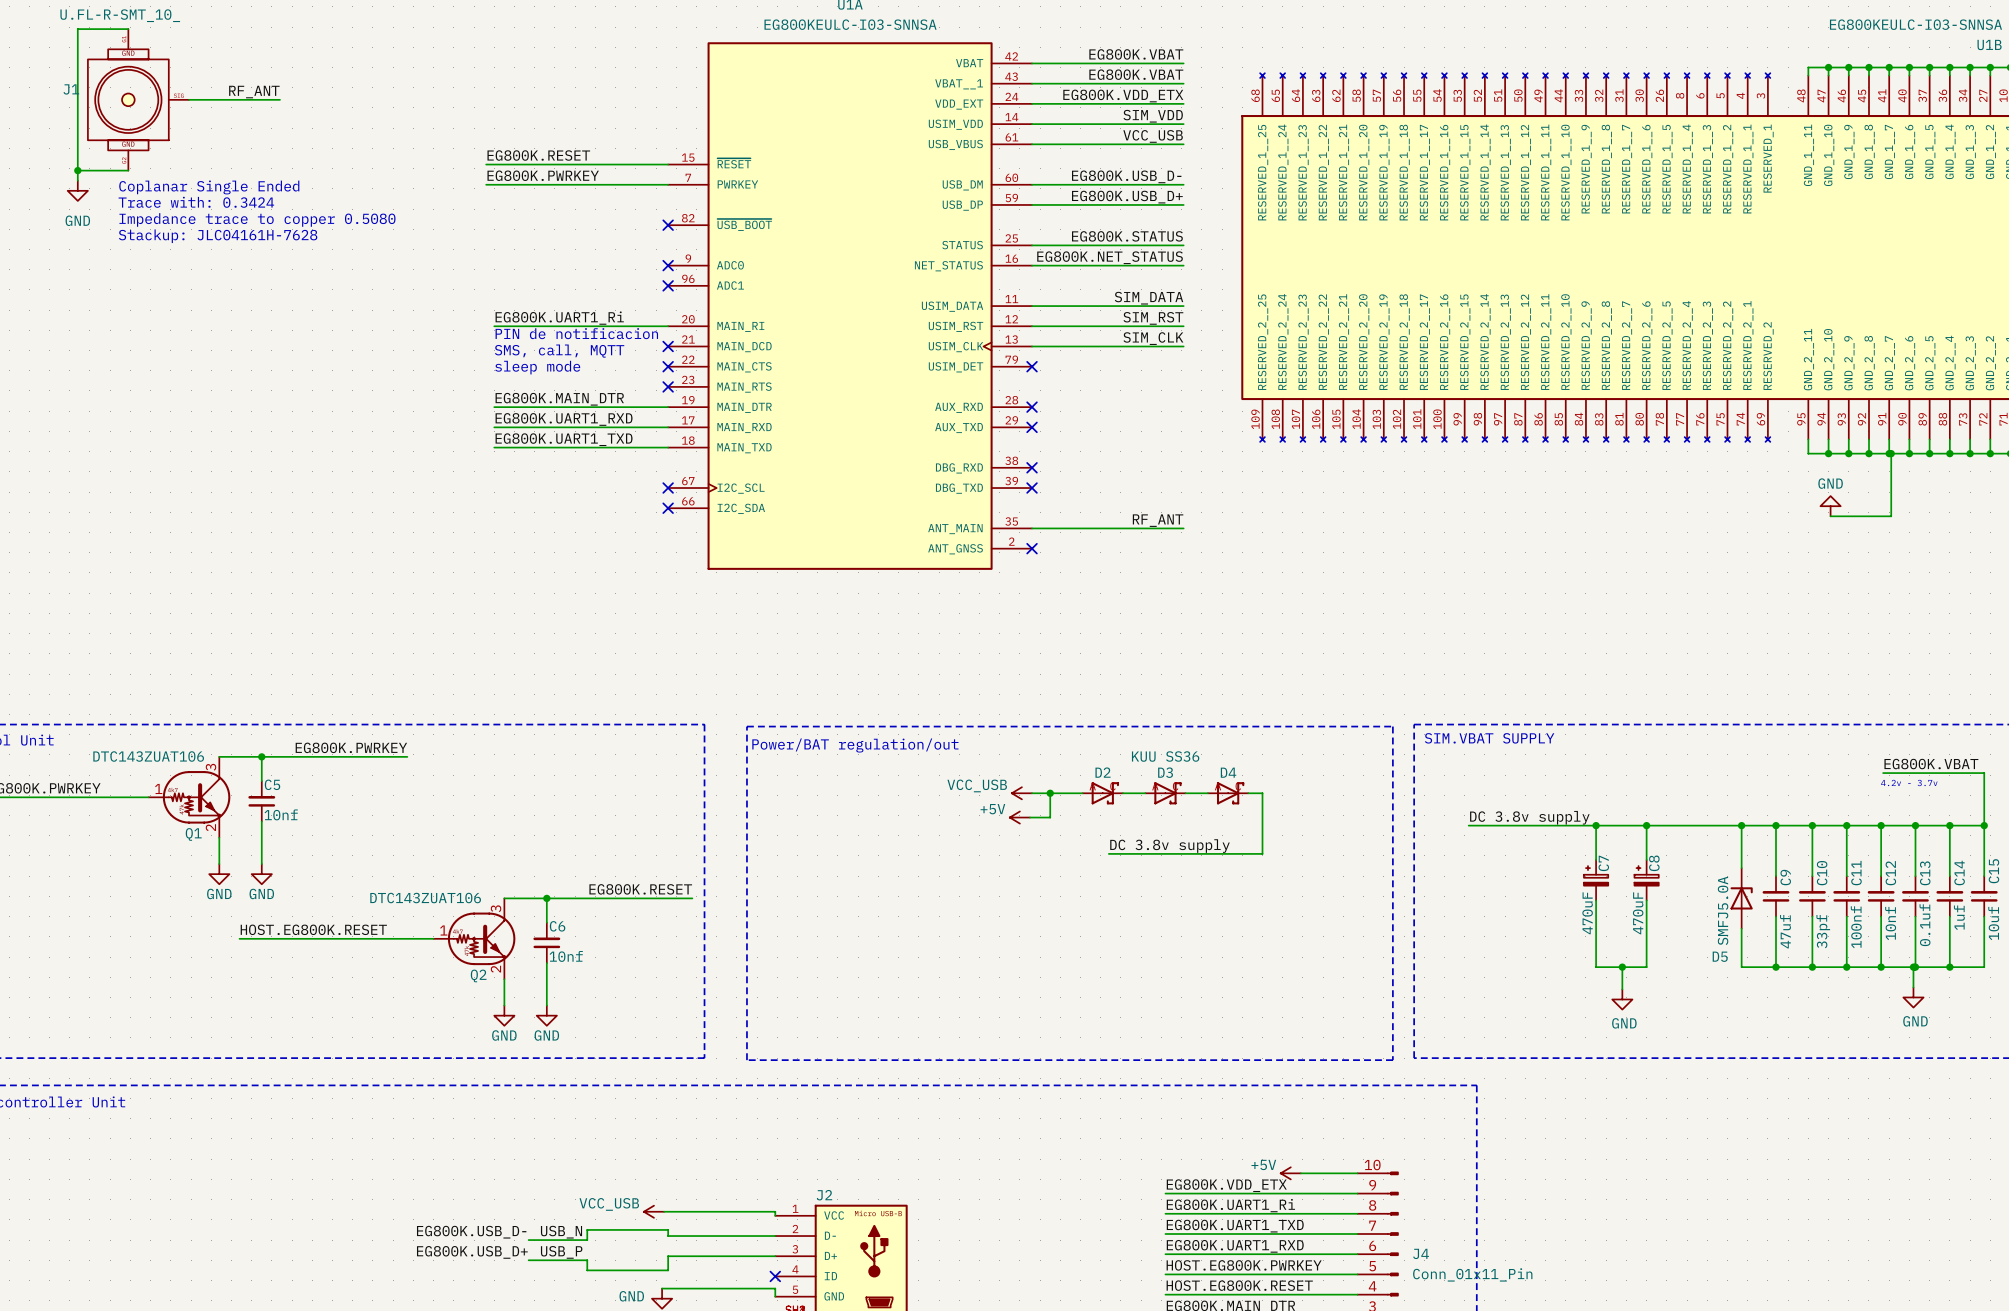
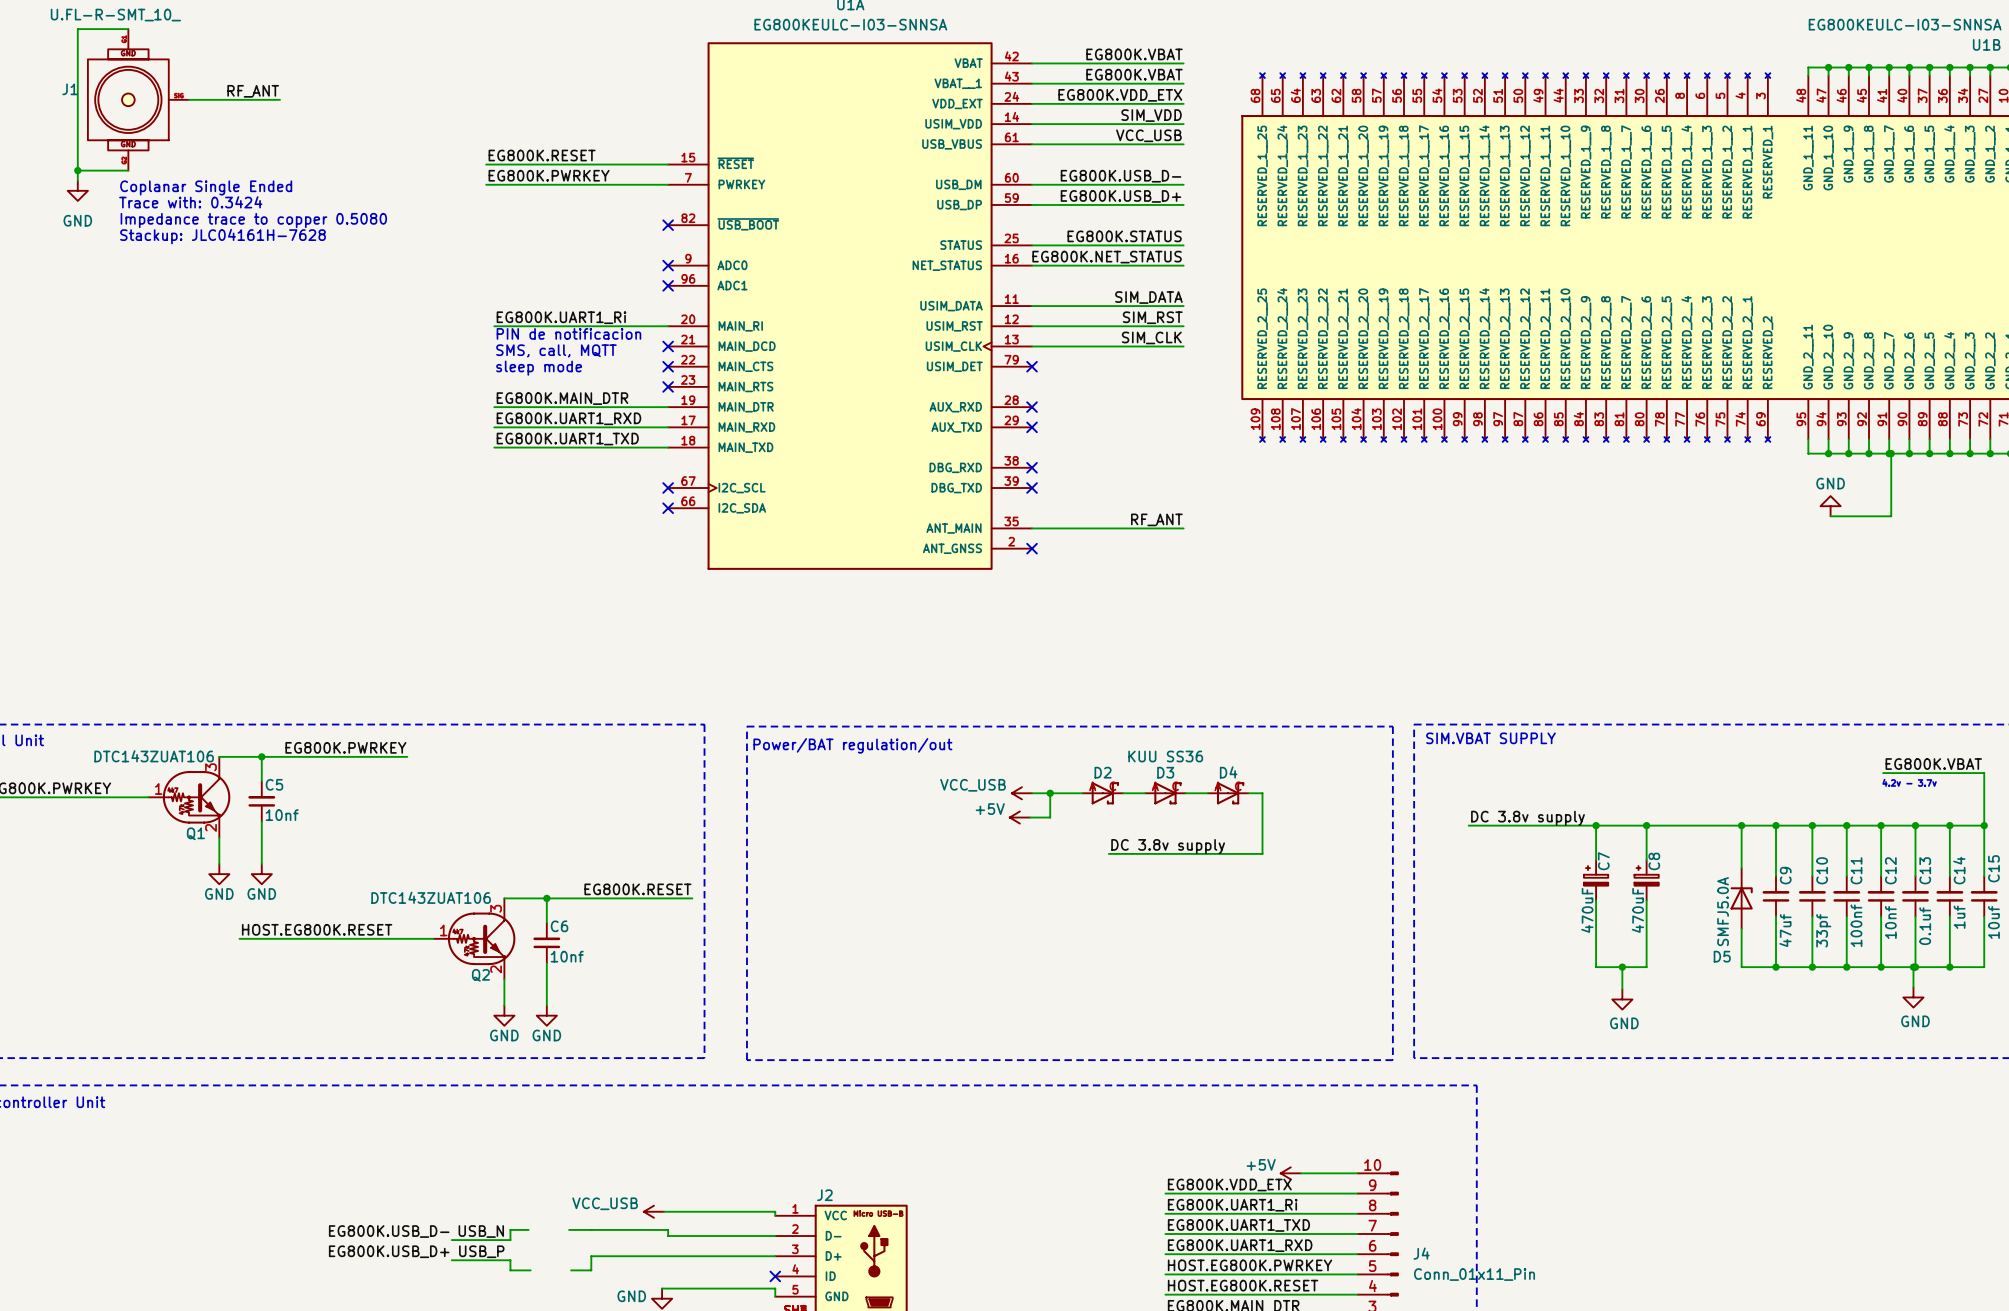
wire: none -> (528, 1229) (510, 1229) (510, 1240) (451, 1240)
wire: (587, 1229) (587, 1240) (528, 1240) -> (587, 1229) (569, 1229)
label position: EG800K.USB_D- (471, 1232) -> EG800K.USB_D- (389, 1231)
label position: USB_N (561, 1232) -> USB_N (481, 1231)
label position: EG800K.USB_D+ (472, 1252) -> EG800K.USB_D+ (389, 1251)
label position: USB_P (561, 1252) -> USB_P (481, 1251)
wire: (668, 1256) (668, 1270) (591, 1270) -> (668, 1256) (591, 1256) (591, 1270)
wire: none -> (451, 1260) (510, 1260) (510, 1270) (530, 1270)
wire: (528, 1260) (587, 1260) (587, 1270) -> (571, 1270) (587, 1270)

